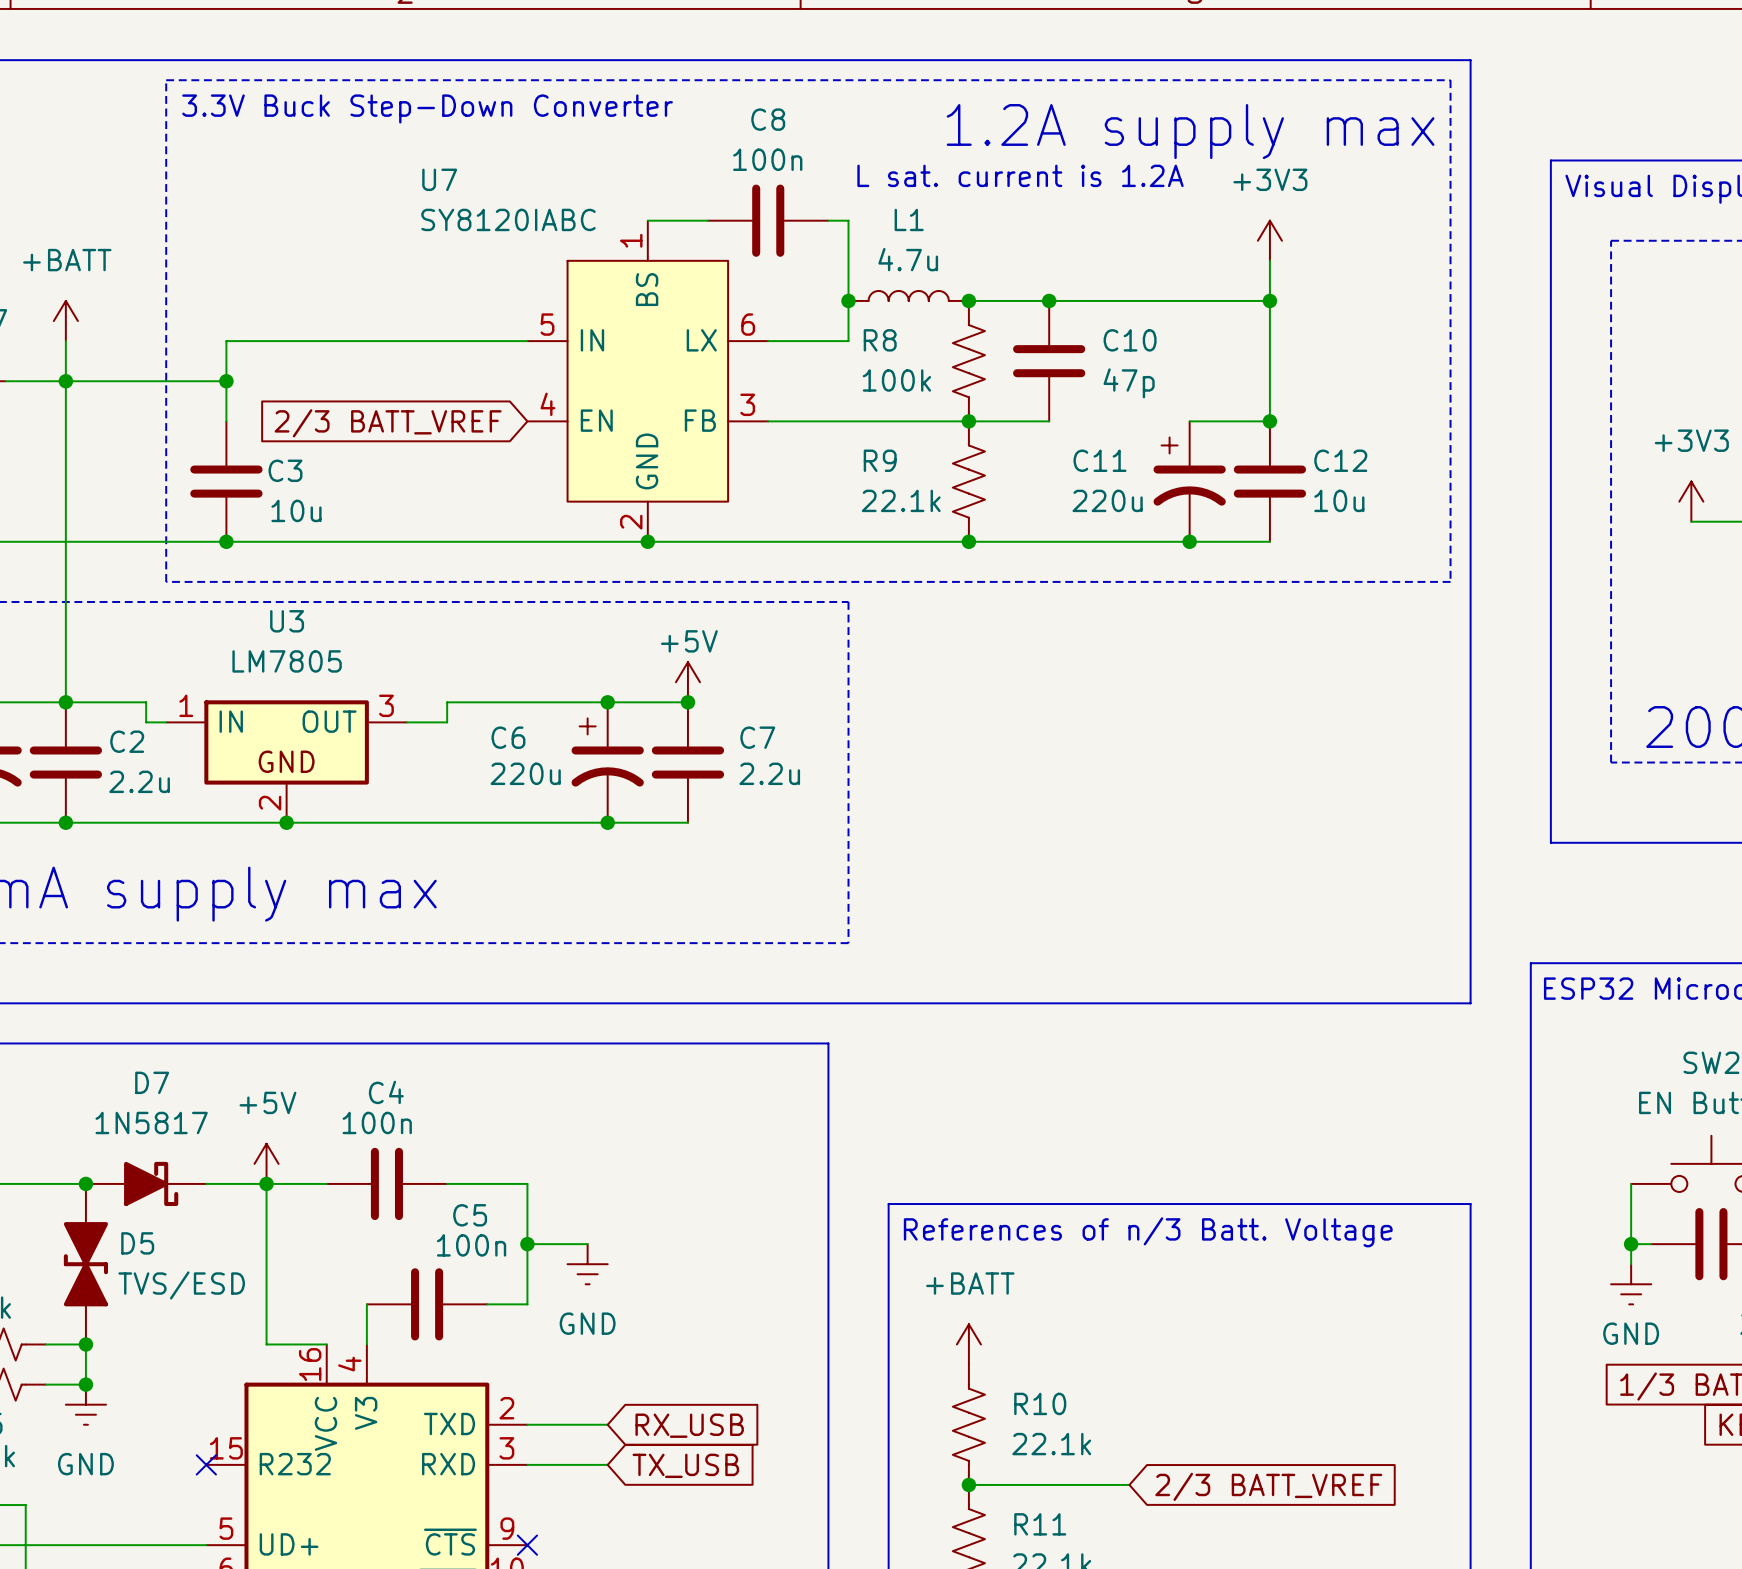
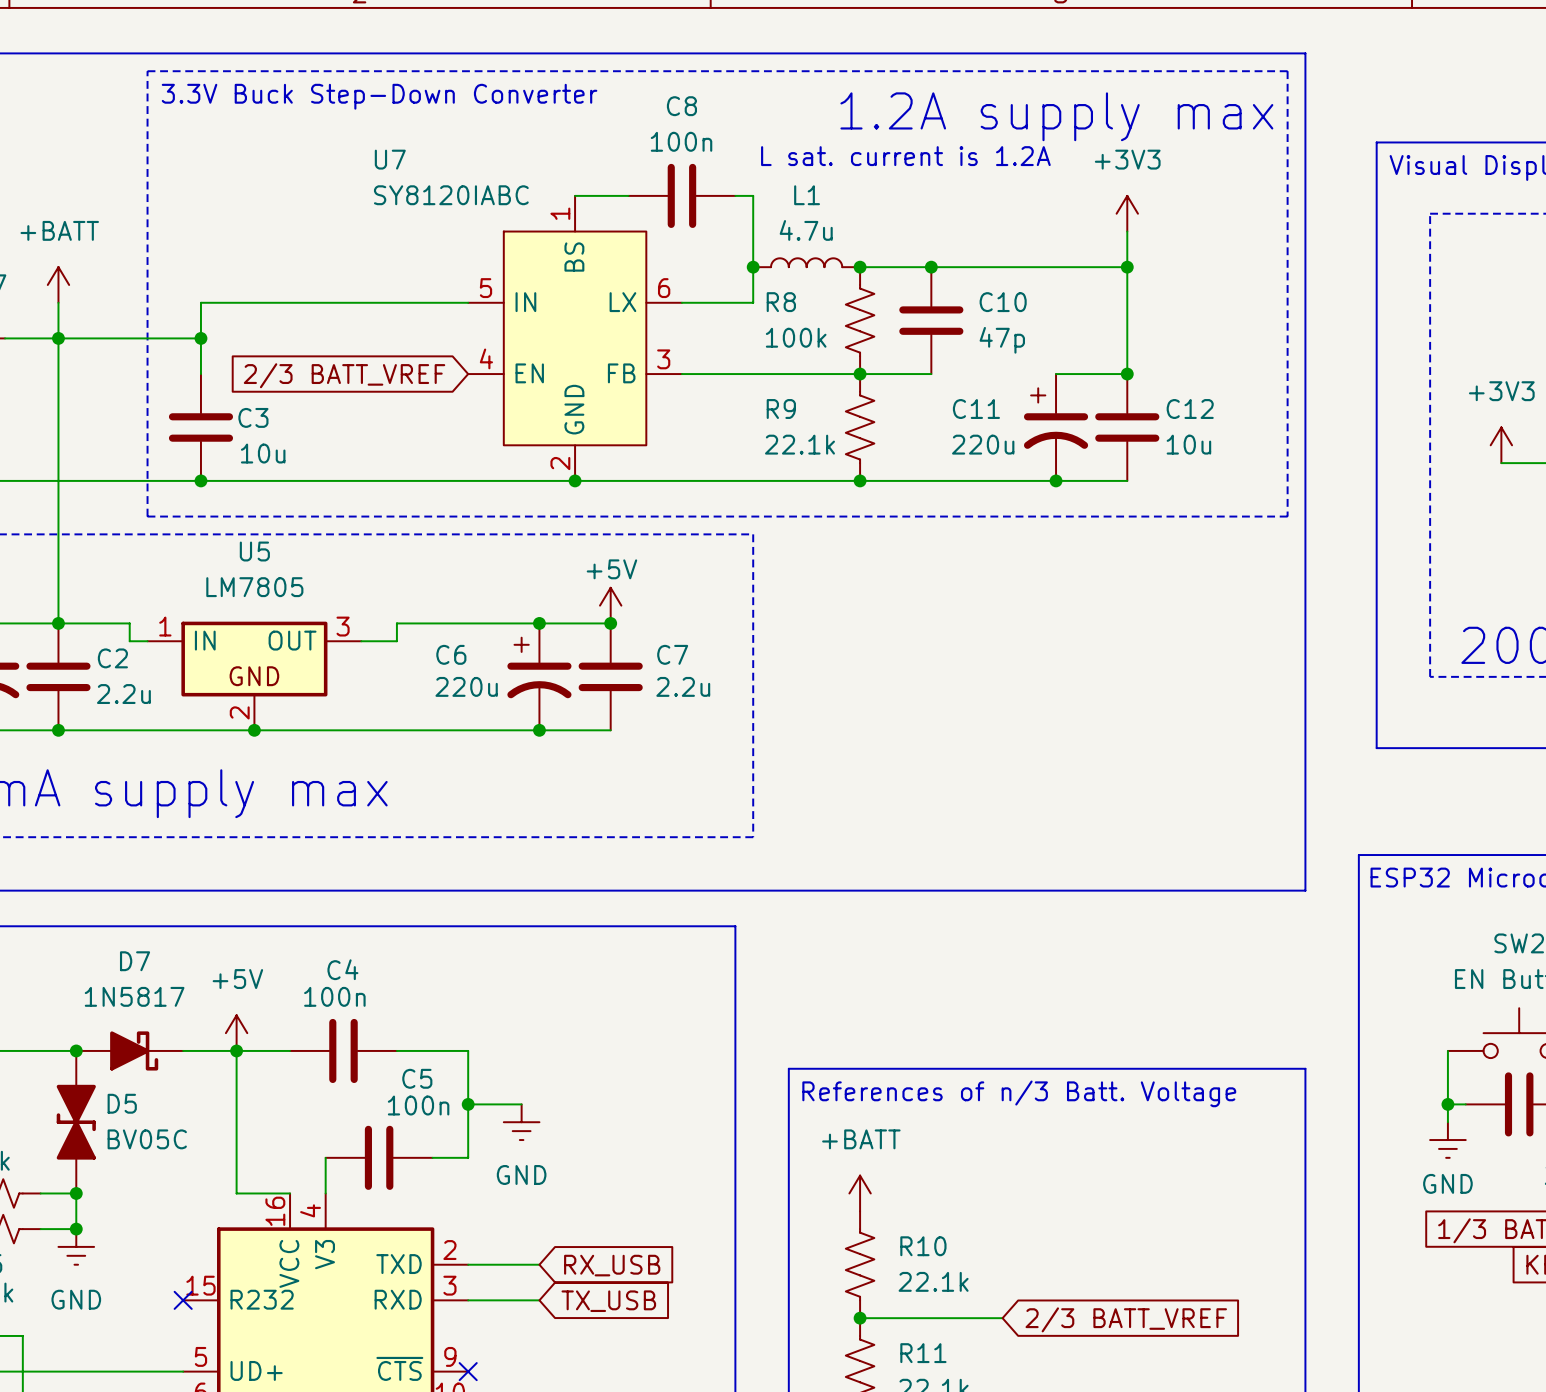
U3 name: U3 (287, 621) -> U5 (254, 551)
D5 value: TVS/ESD (181, 1285) -> BV05C (147, 1139)

